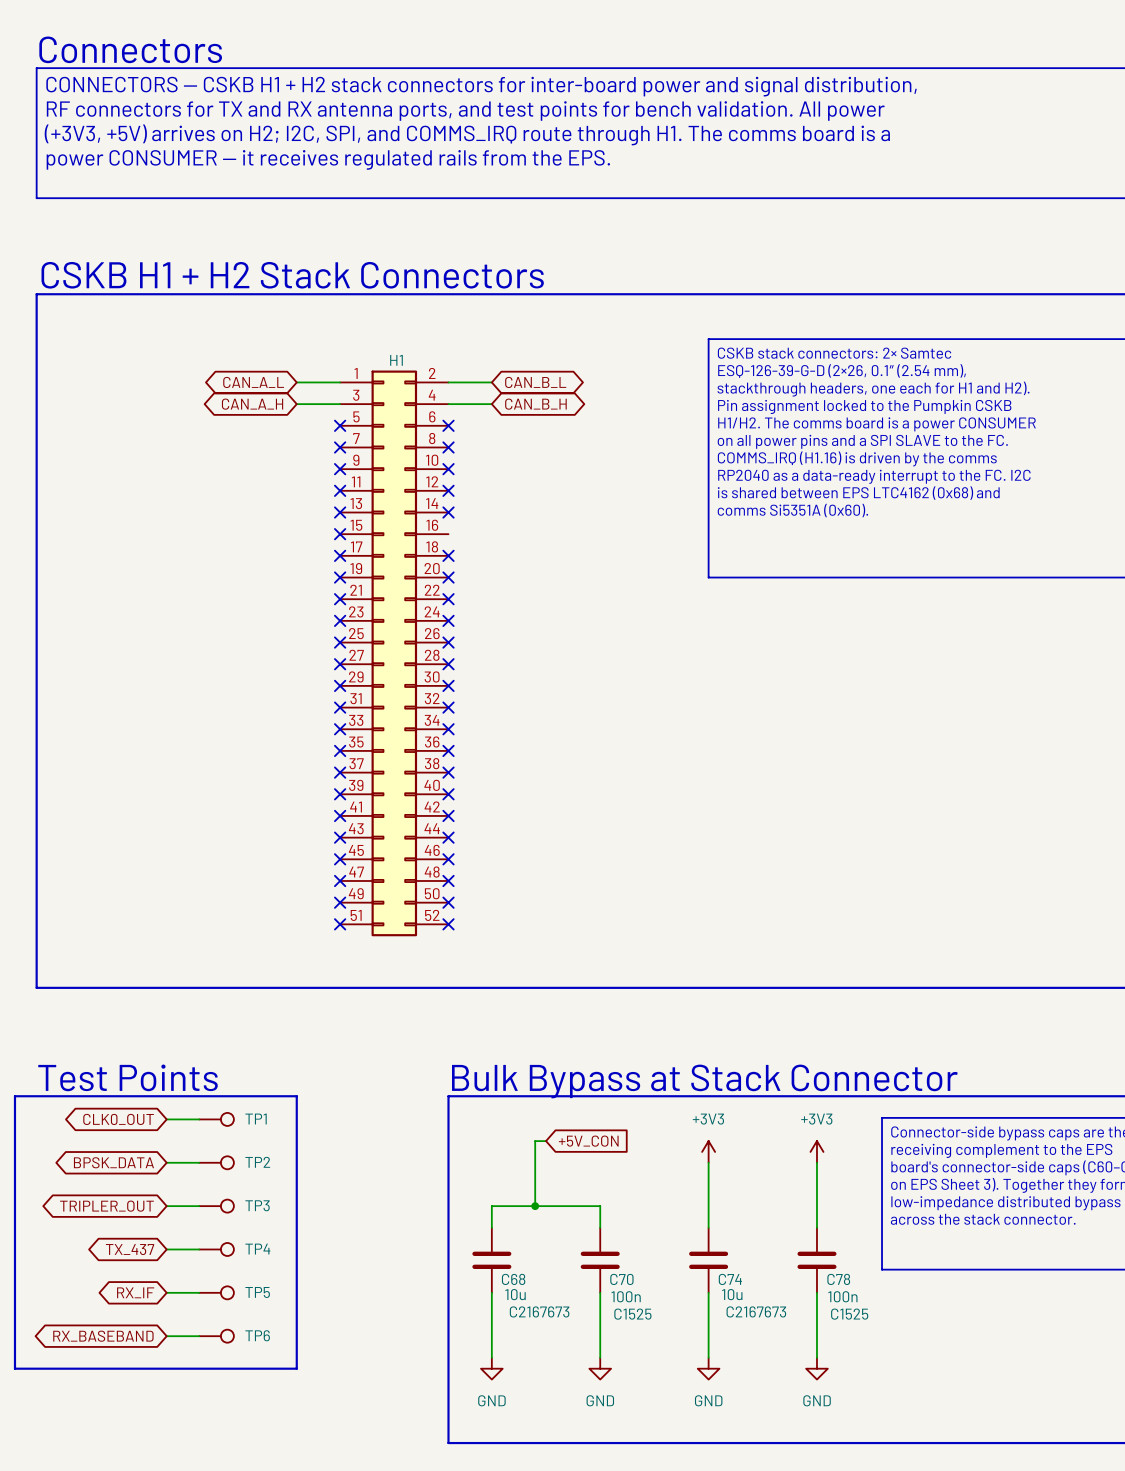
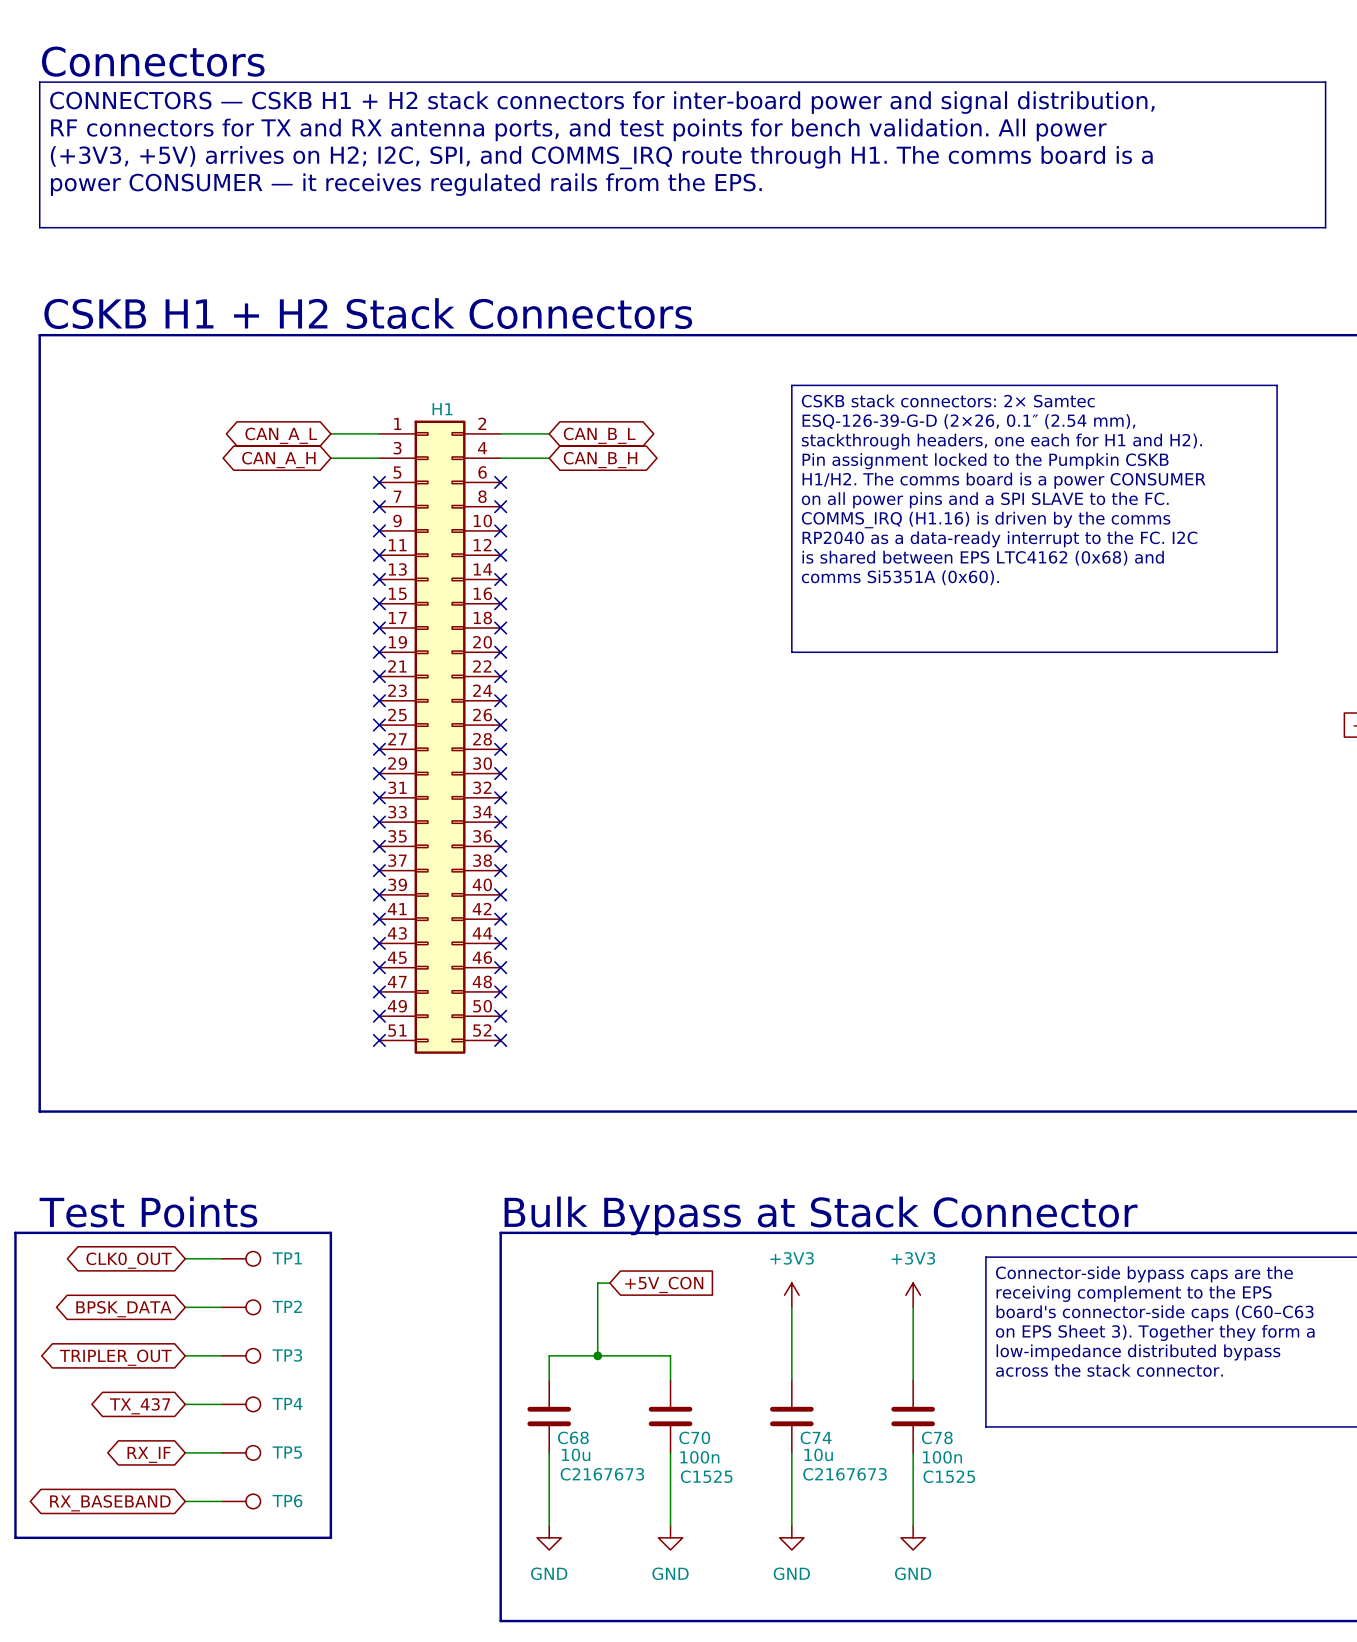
no-connect mark: none -> (500, 603)

